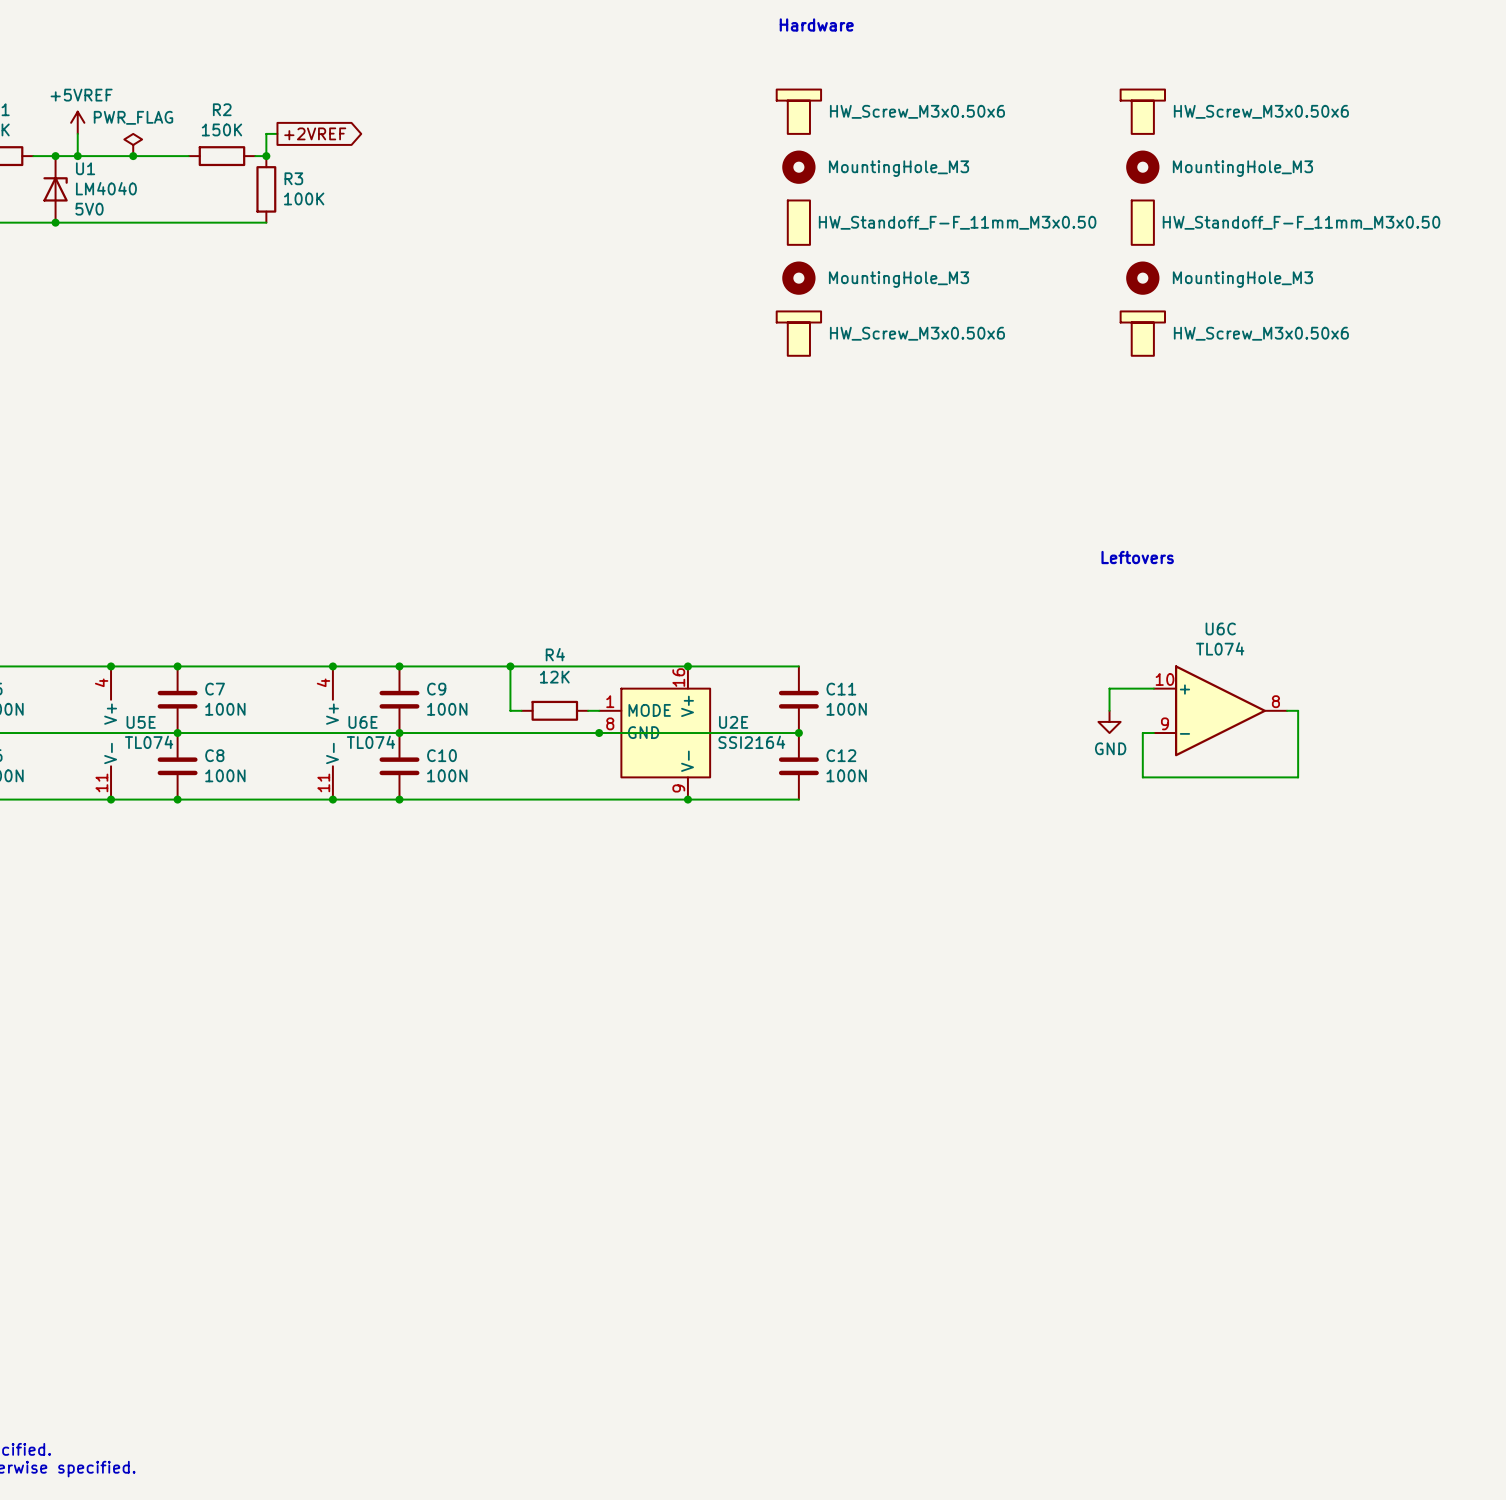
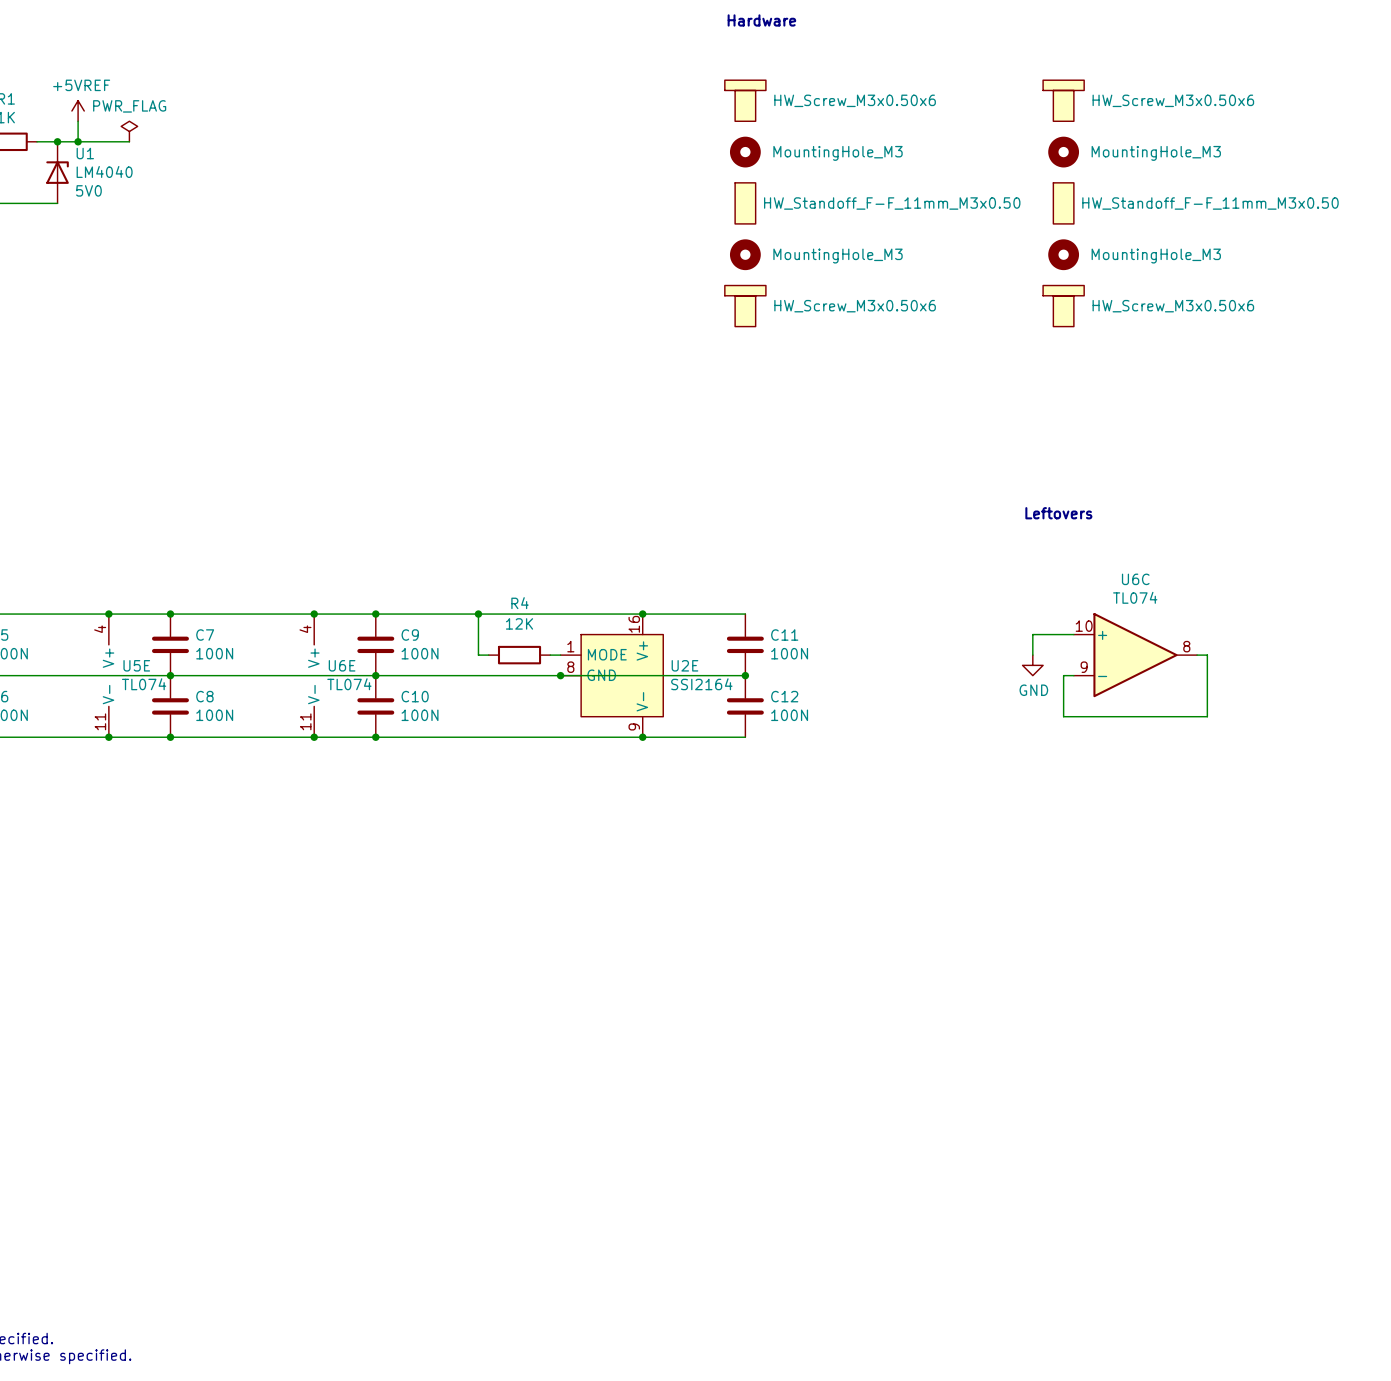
wire: (277, 133) (266, 133) (266, 156) (255, 156) -> none
global label: +2VREF (315, 133) -> none
wire: (133, 156) (188, 156) -> none
junction: (133, 156) -> none
R2: 150K (221, 156) -> none
junction: (266, 156) -> none
R3: 100K (266, 189) -> none
wire: (55, 222) (266, 222) -> none
junction: (55, 222) -> none

